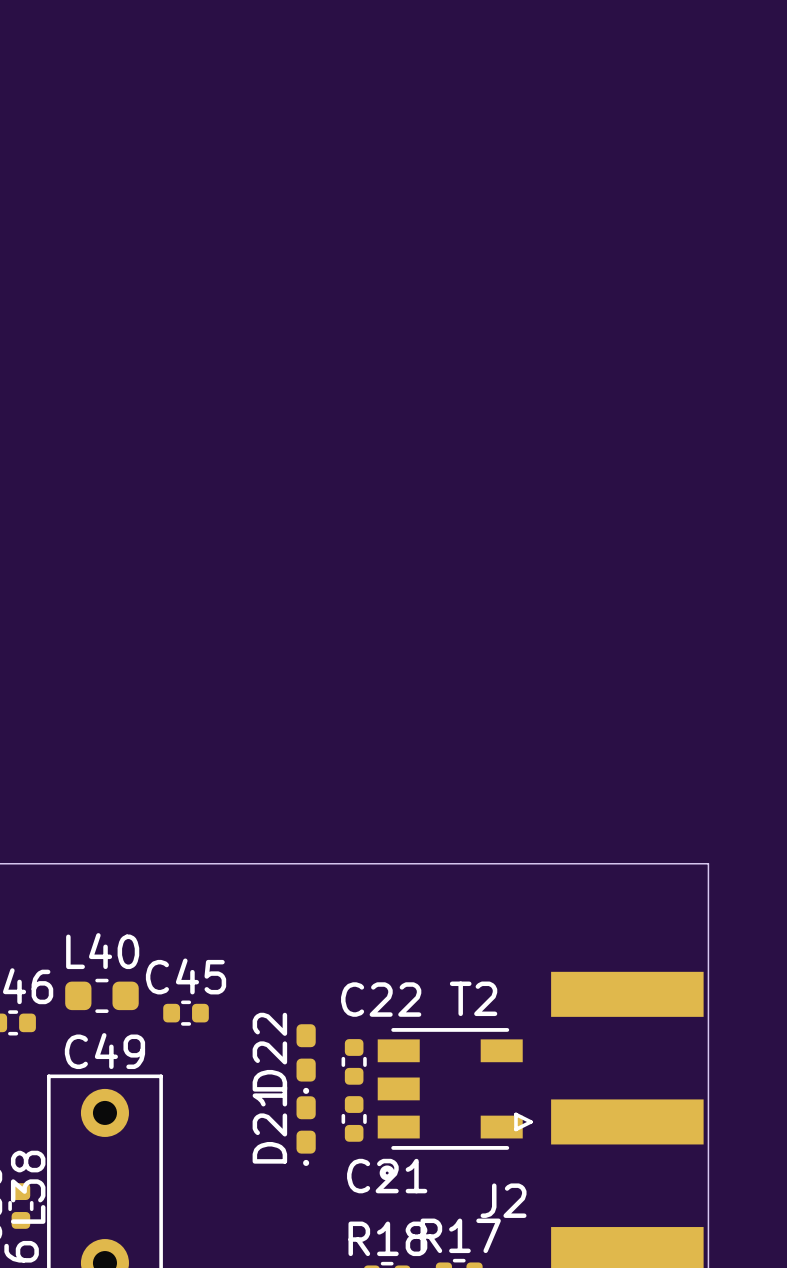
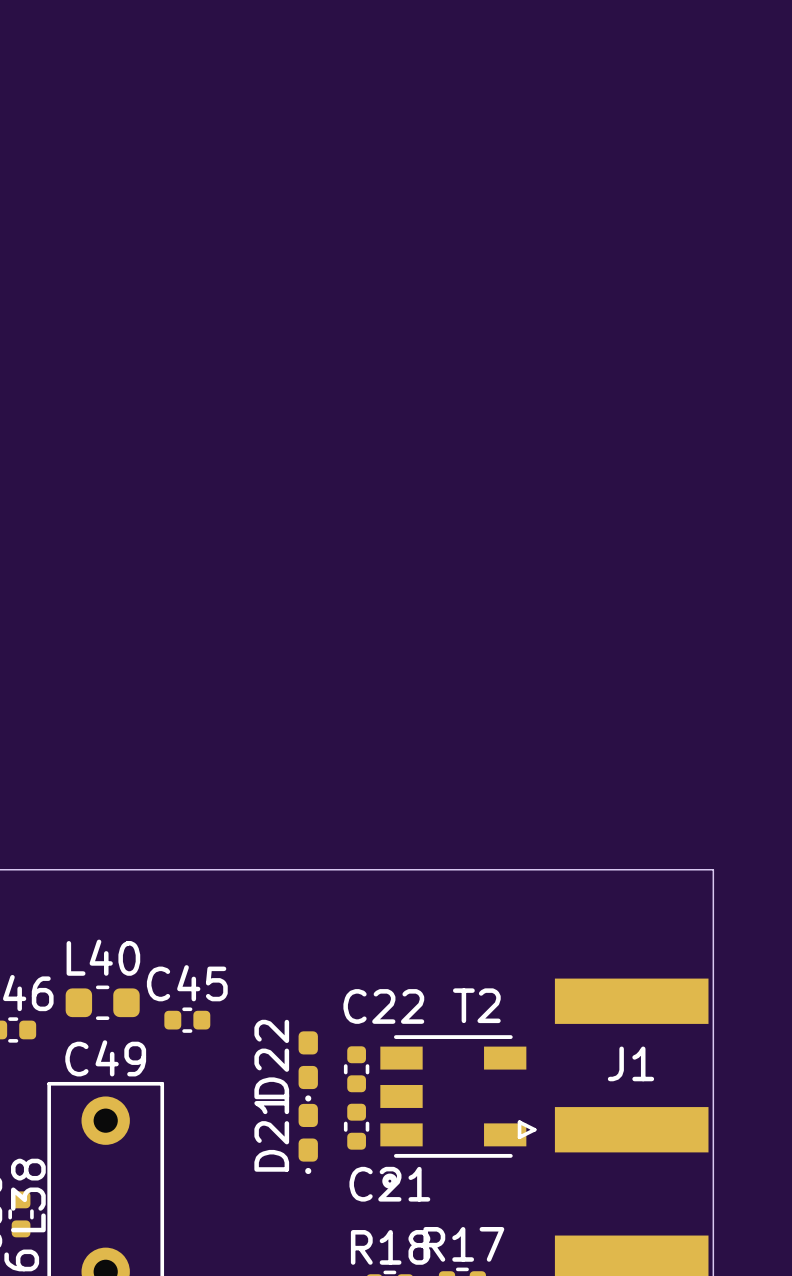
J2 name: J2 (503, 1200) -> J1 (630, 1063)

